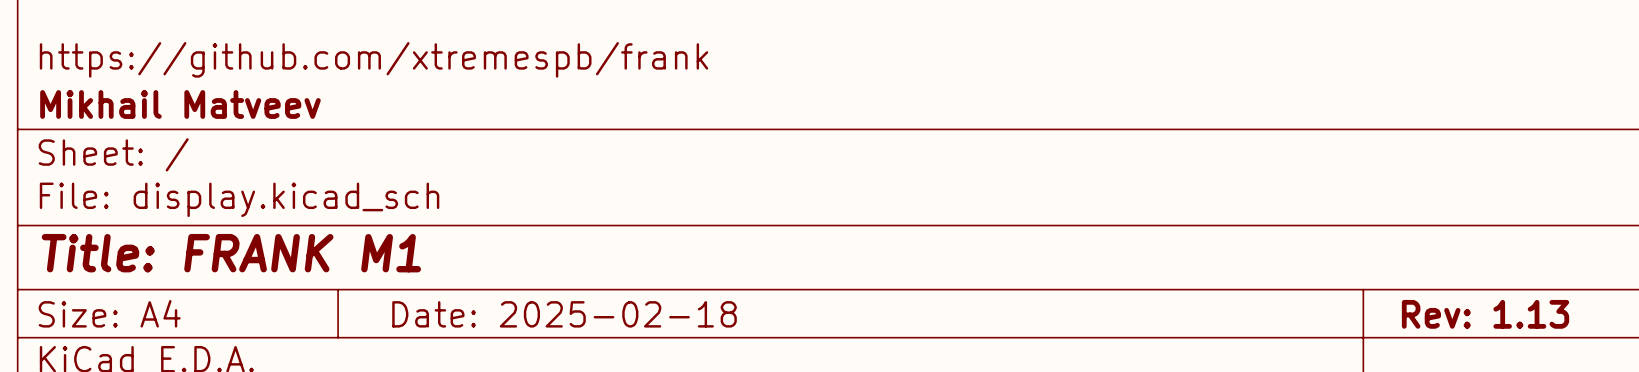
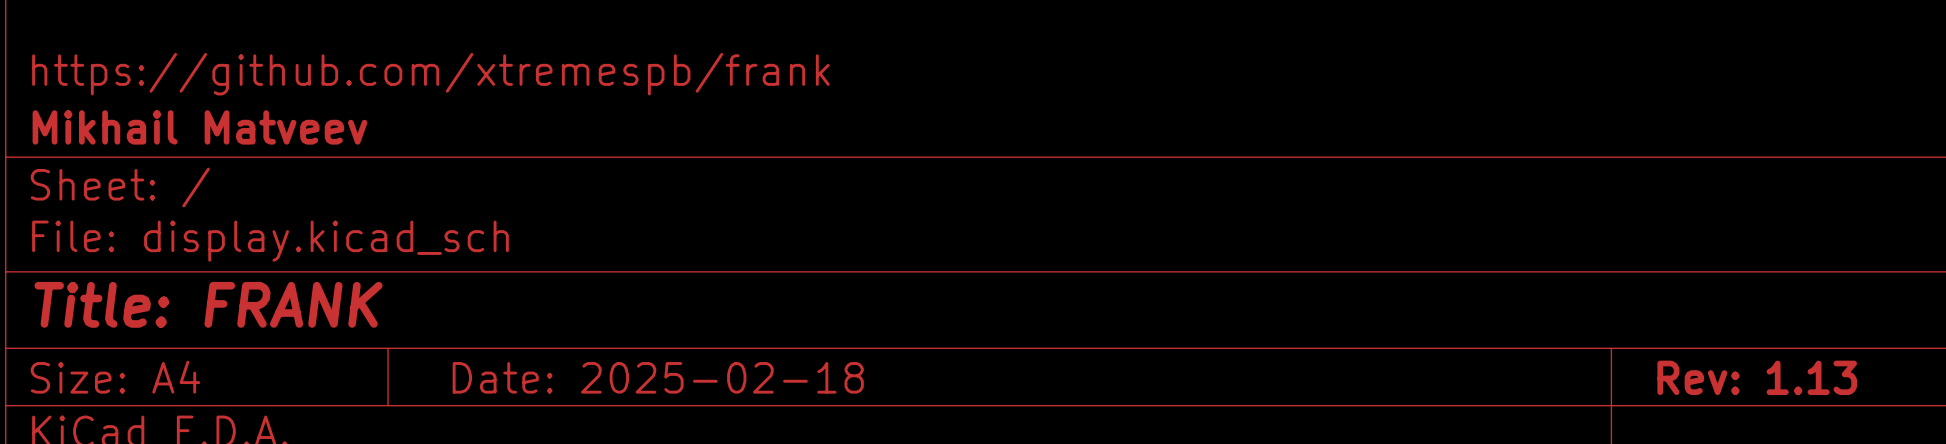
title block: Title: FRANK M1 (231, 253) -> Title: FRANK (208, 304)

